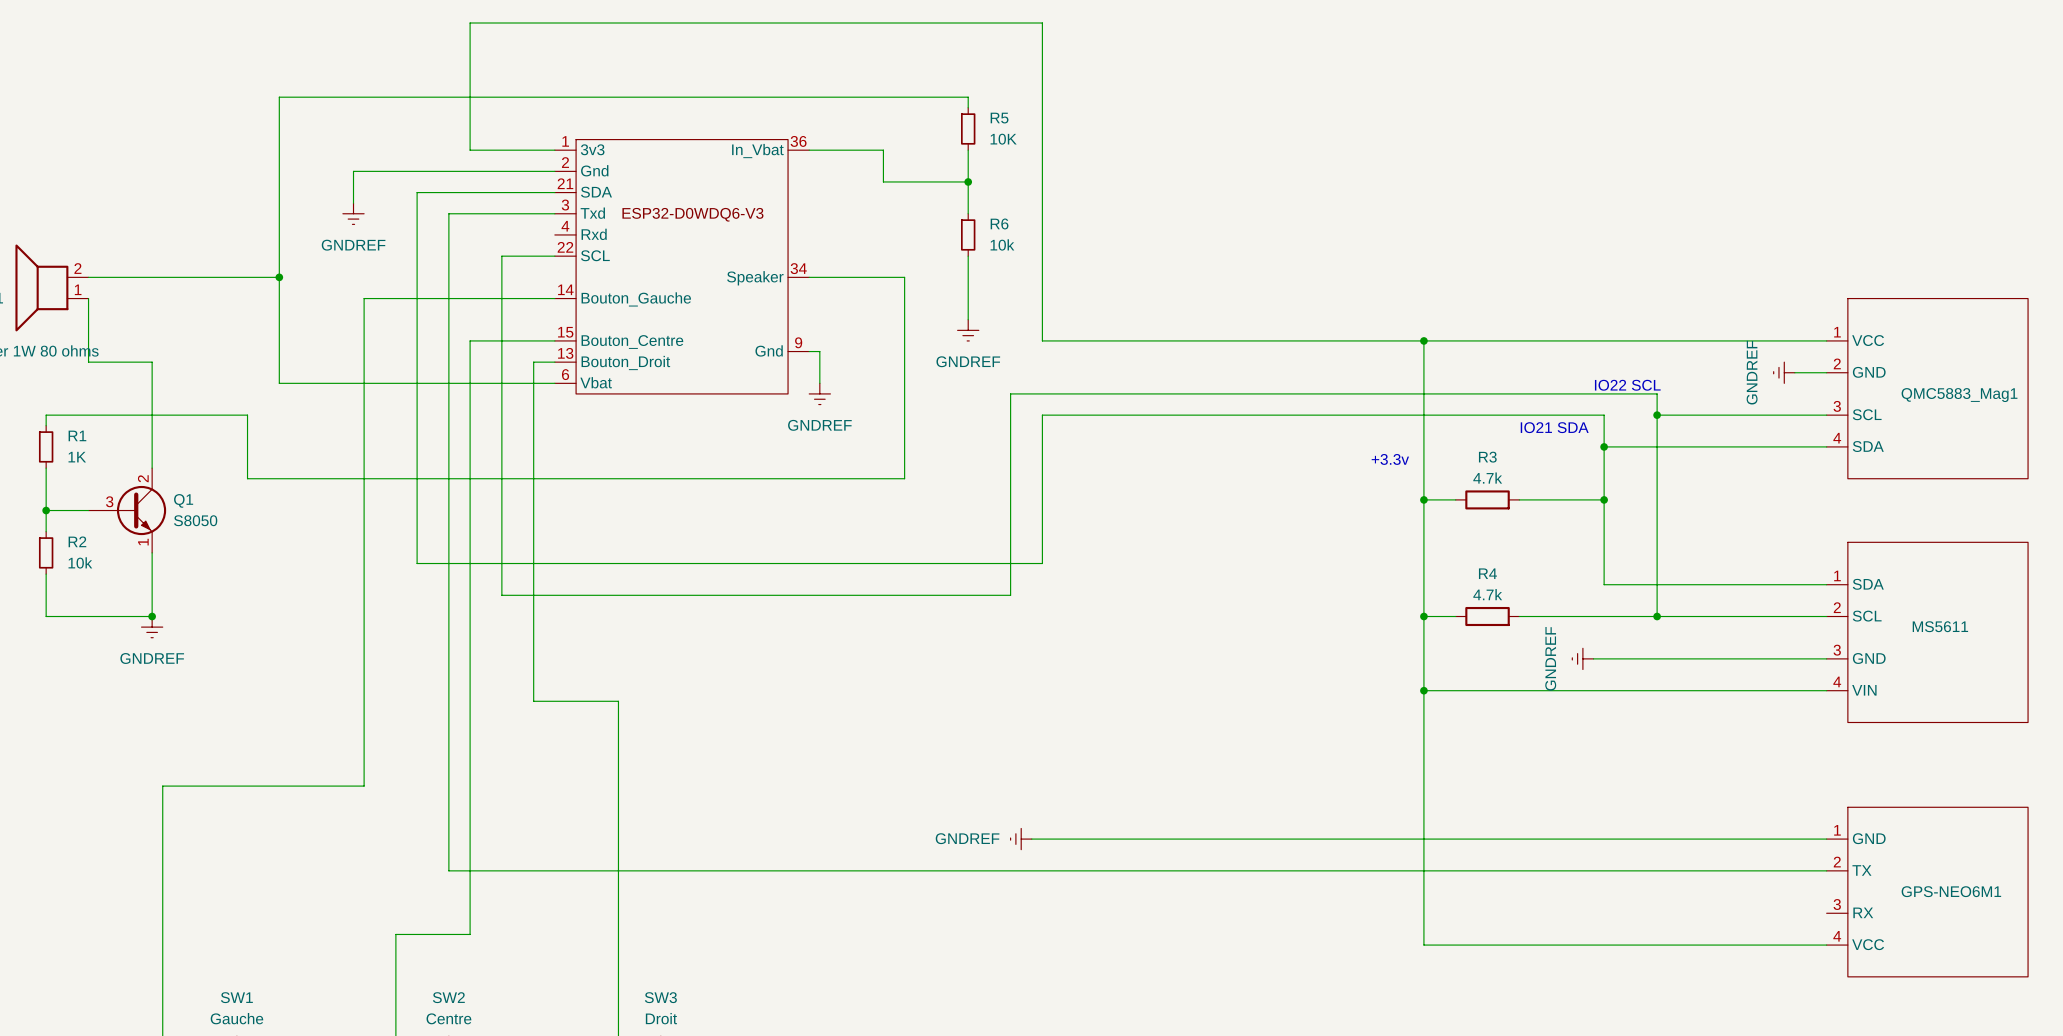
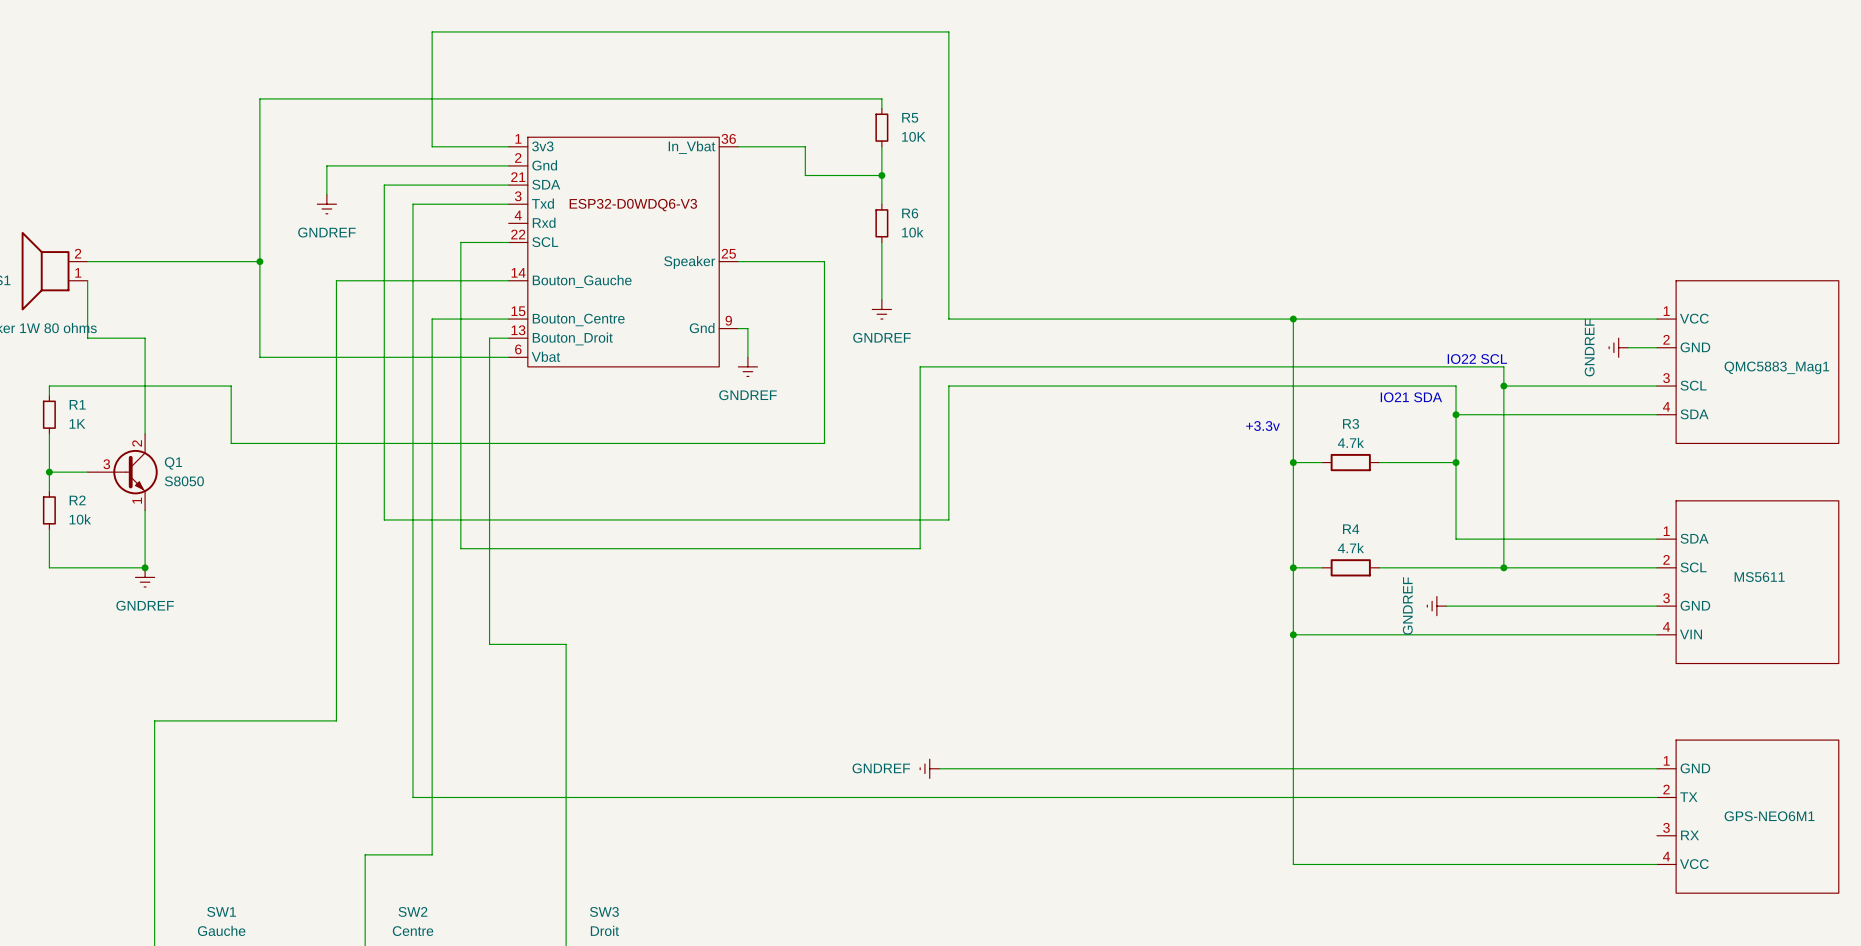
part pin number: 34 (798, 268) -> 25 (728, 253)

